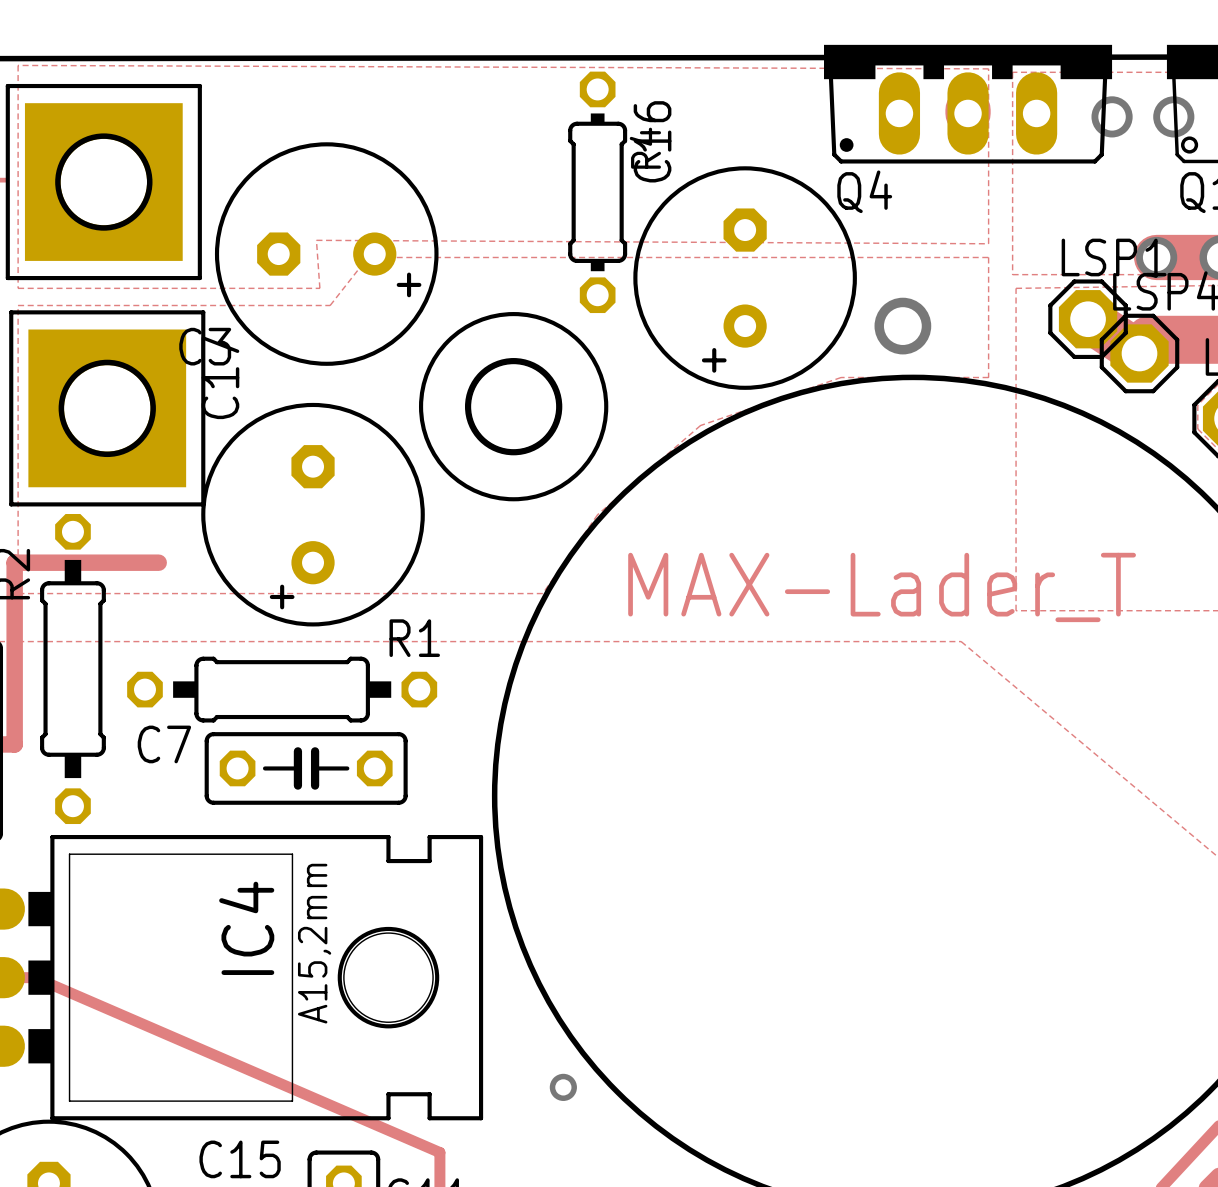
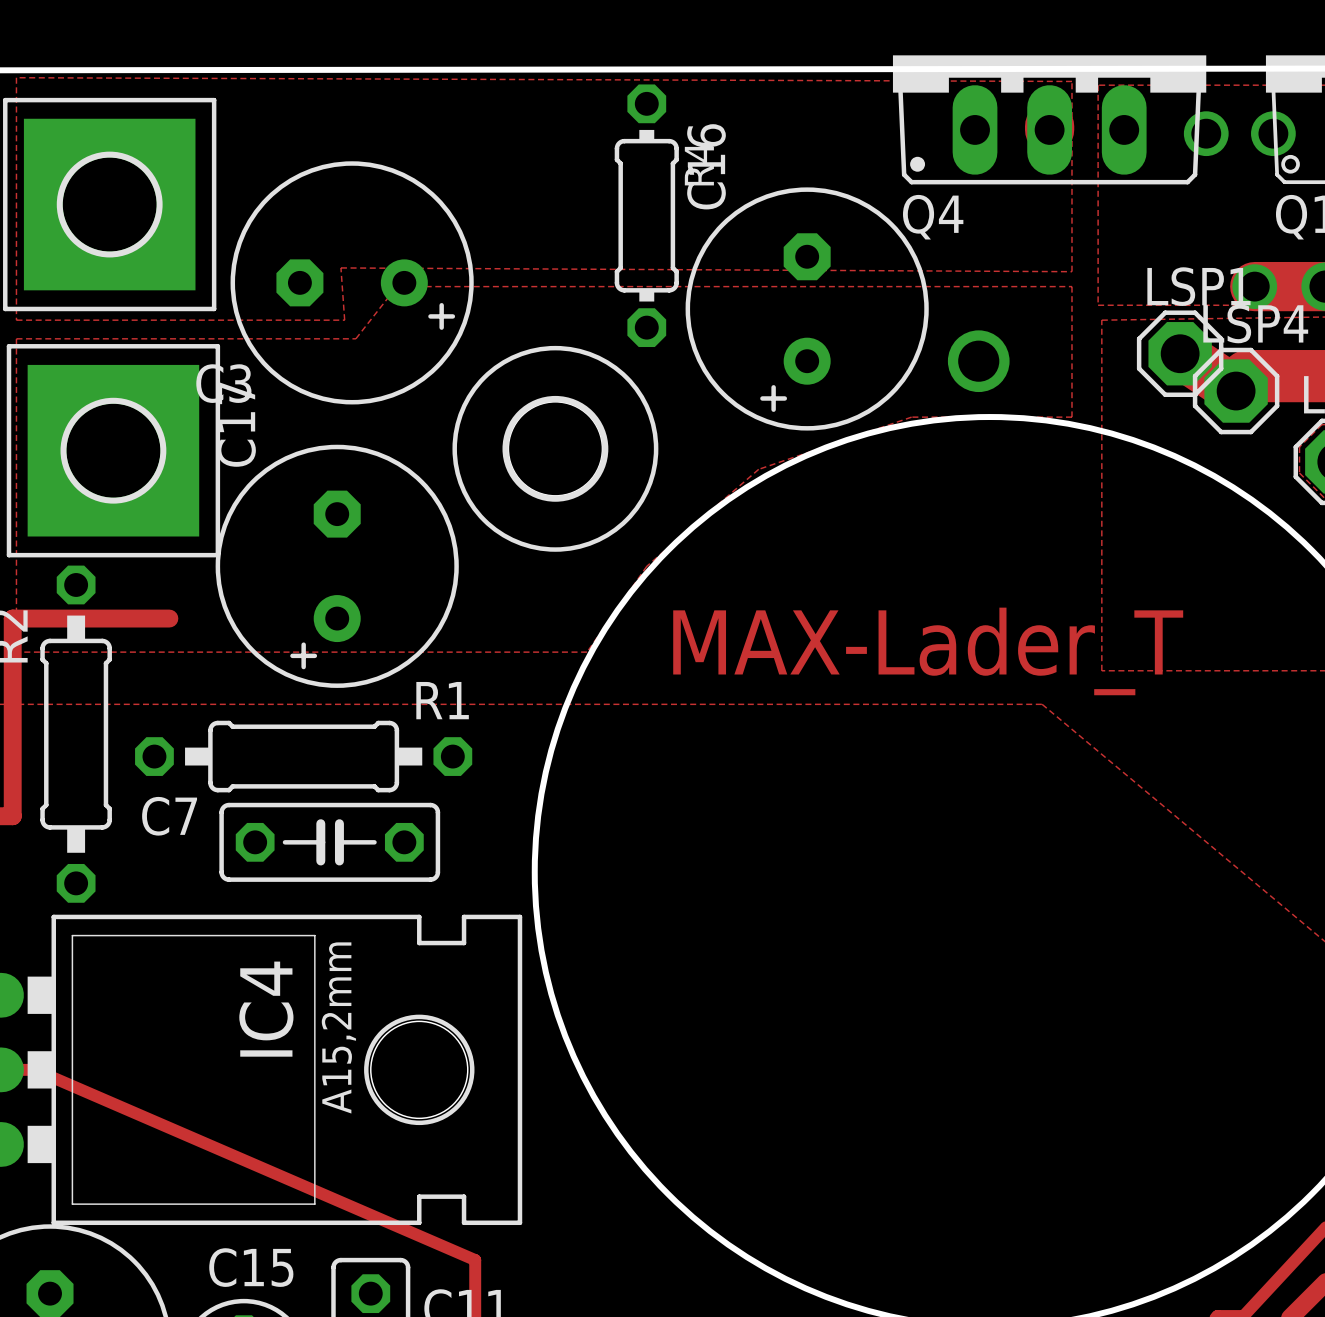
via: (563, 1087) -> none

